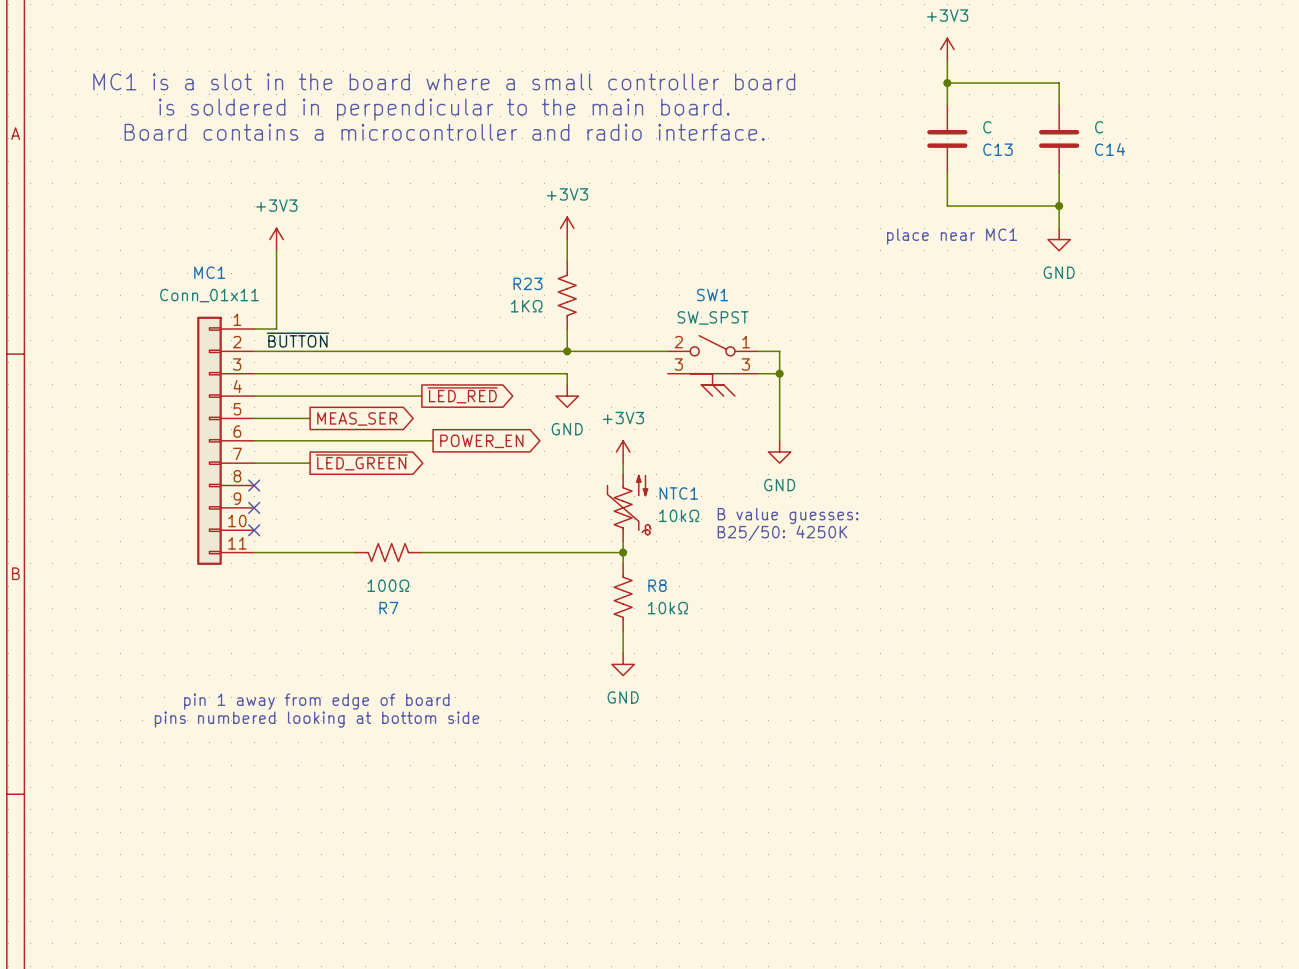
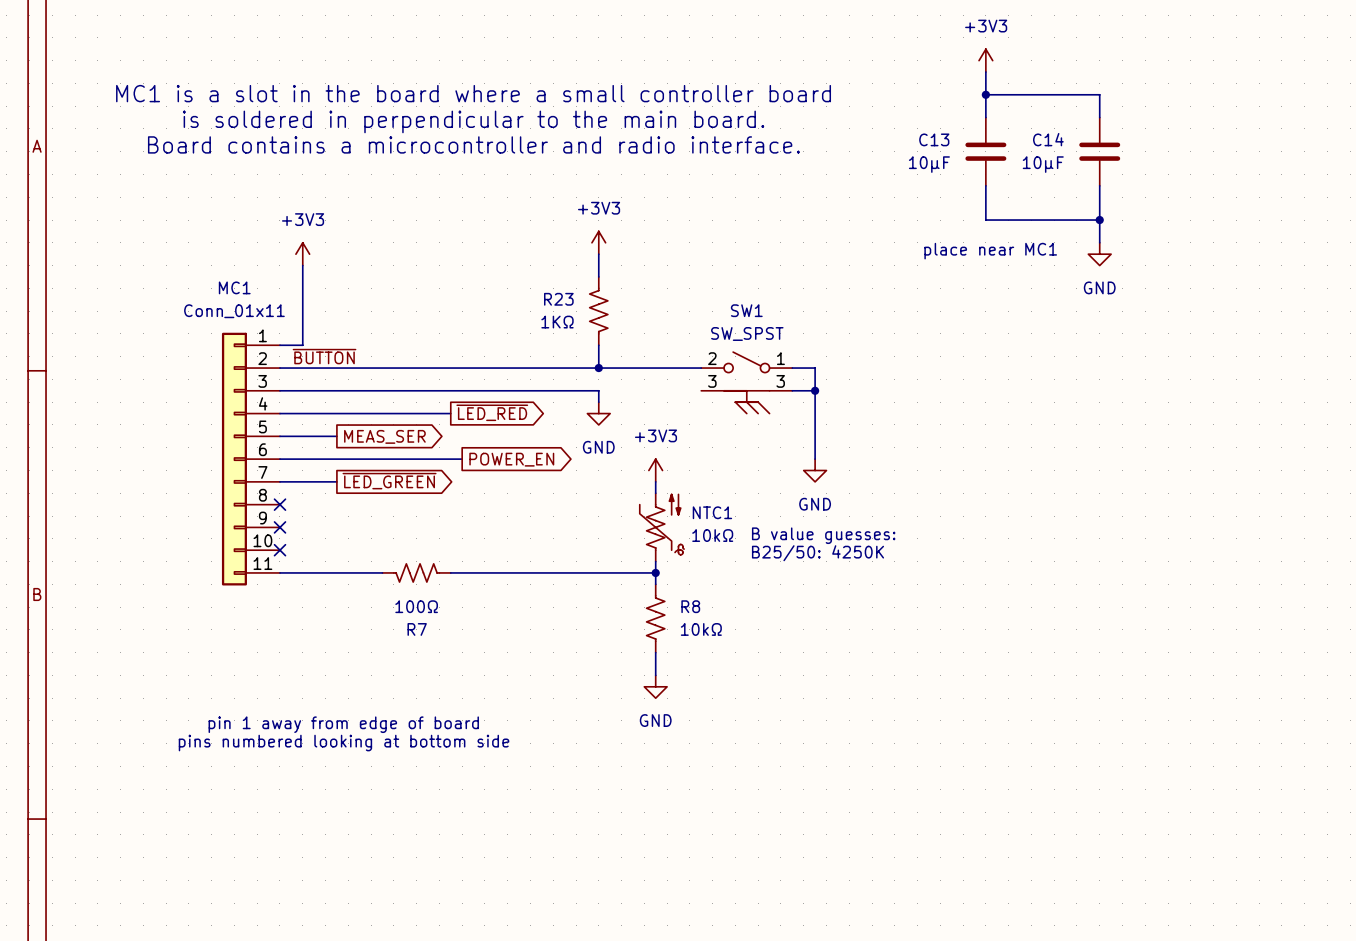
C13 value: C (987, 127) -> 10µF (929, 164)
C14 value: C (1099, 127) -> 10µF (1043, 164)
C13 name position: C13 (998, 149) -> C13 (934, 139)
C14 name position: C14 (1110, 149) -> C14 (1048, 139)

